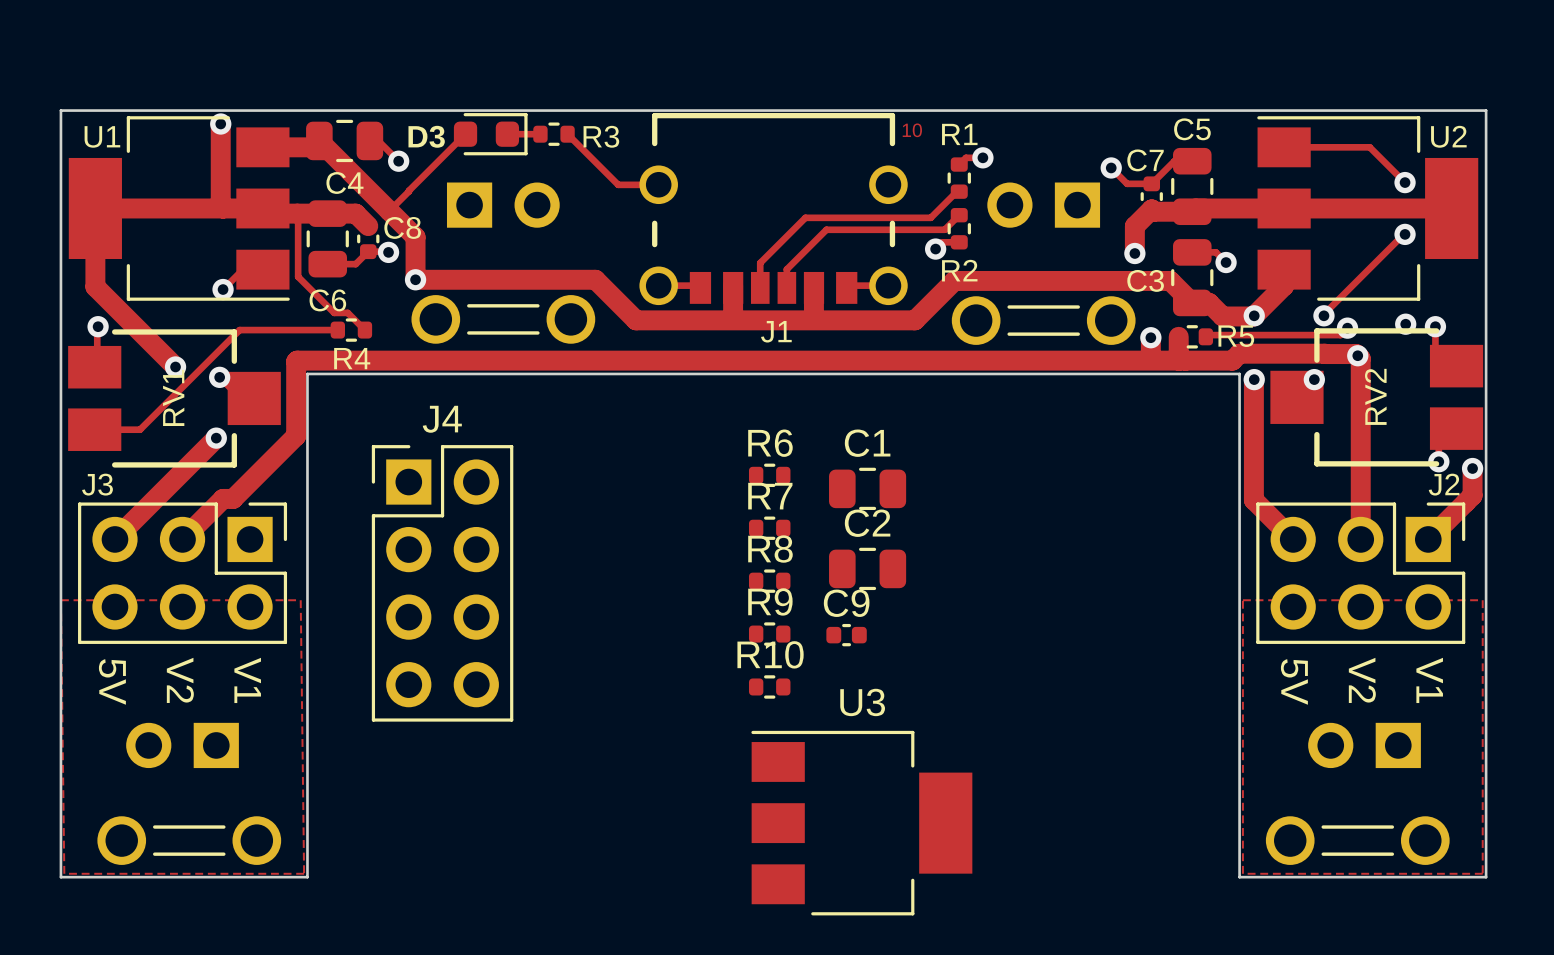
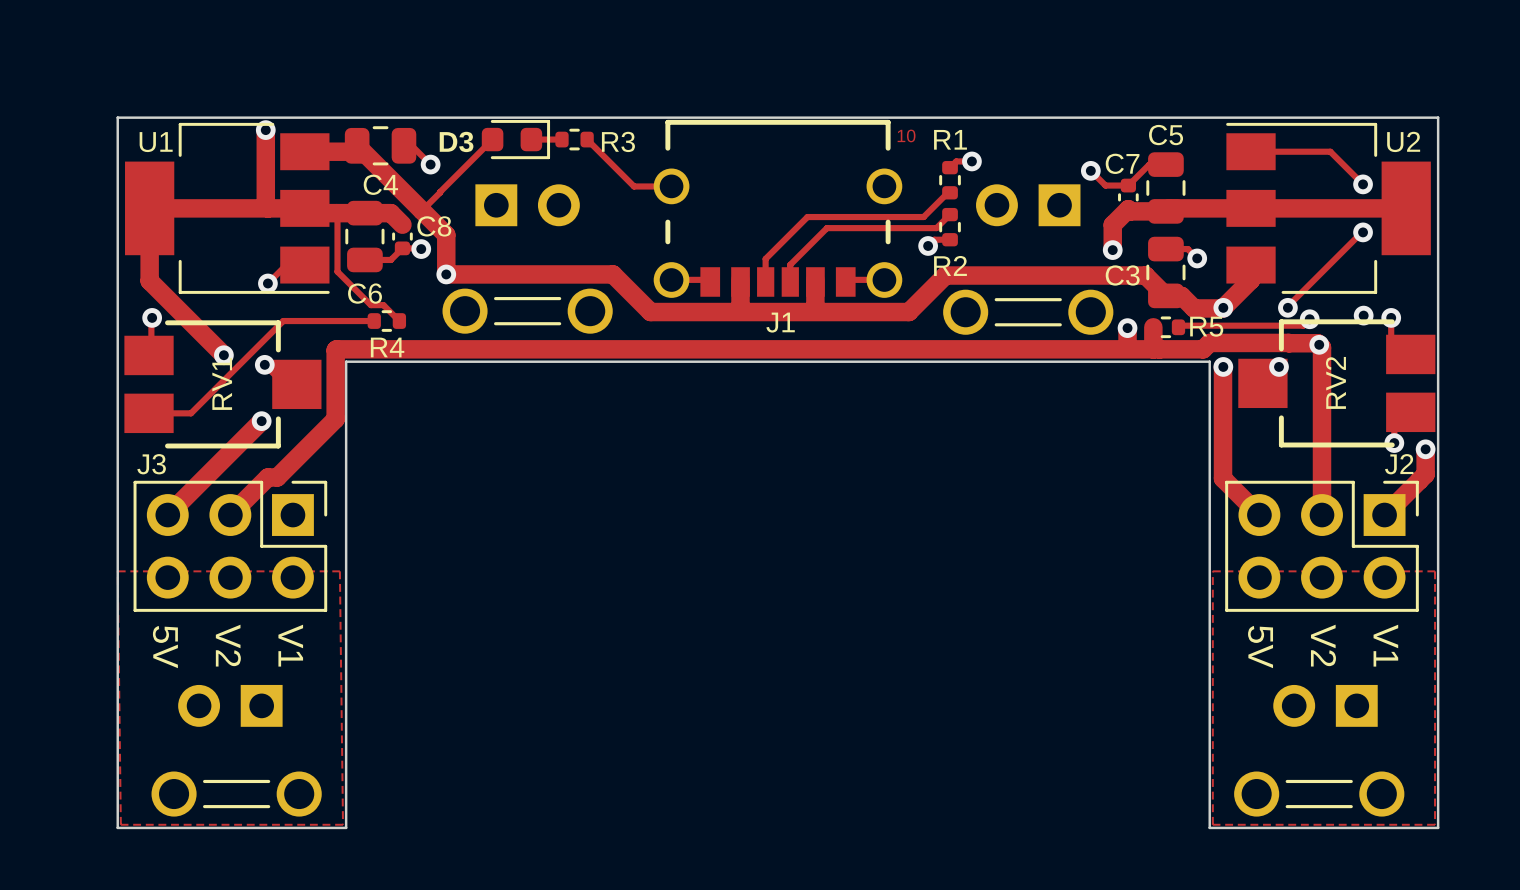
R6: (769, 475) -> none
C1: (867, 488) -> none
R7: (769, 528) -> none
C2: (867, 568) -> none
R8: (769, 581) -> none
J4: (442, 583) -> none
R9: (769, 634) -> none
C9: (846, 635) -> none
R10: (769, 686) -> none
U3: (861, 823) -> none

